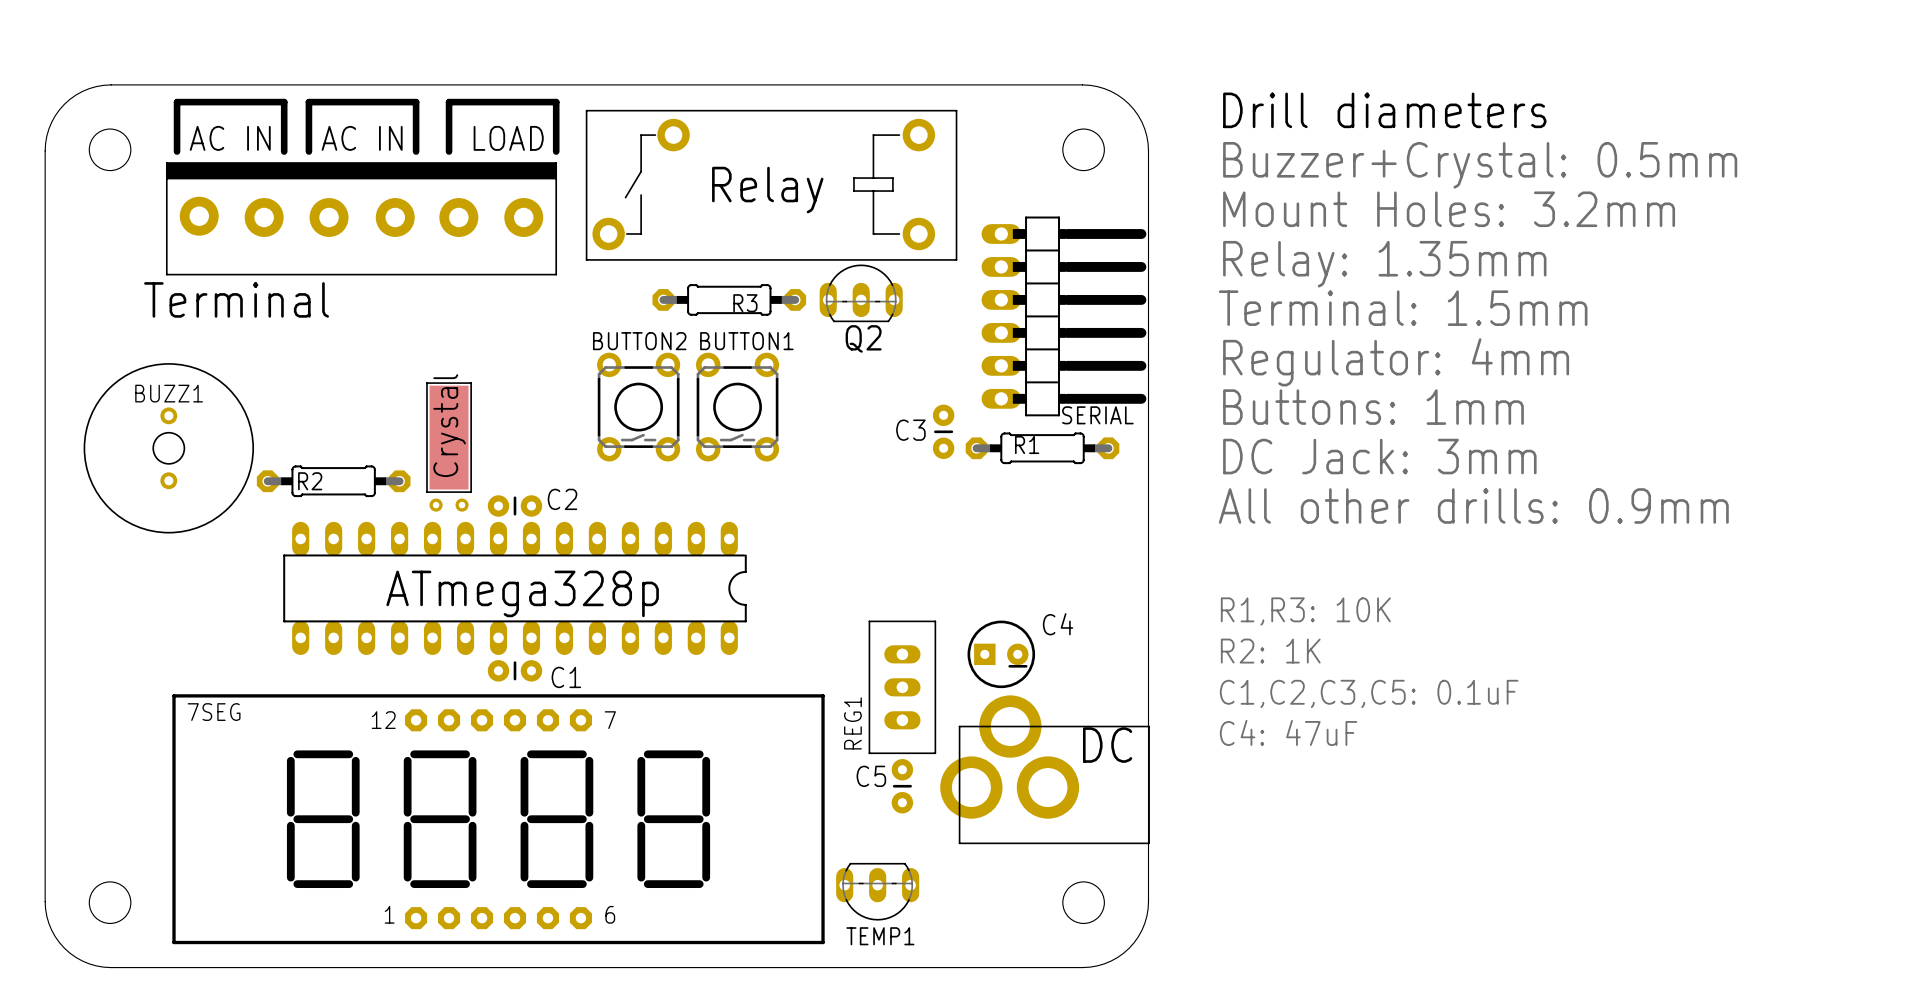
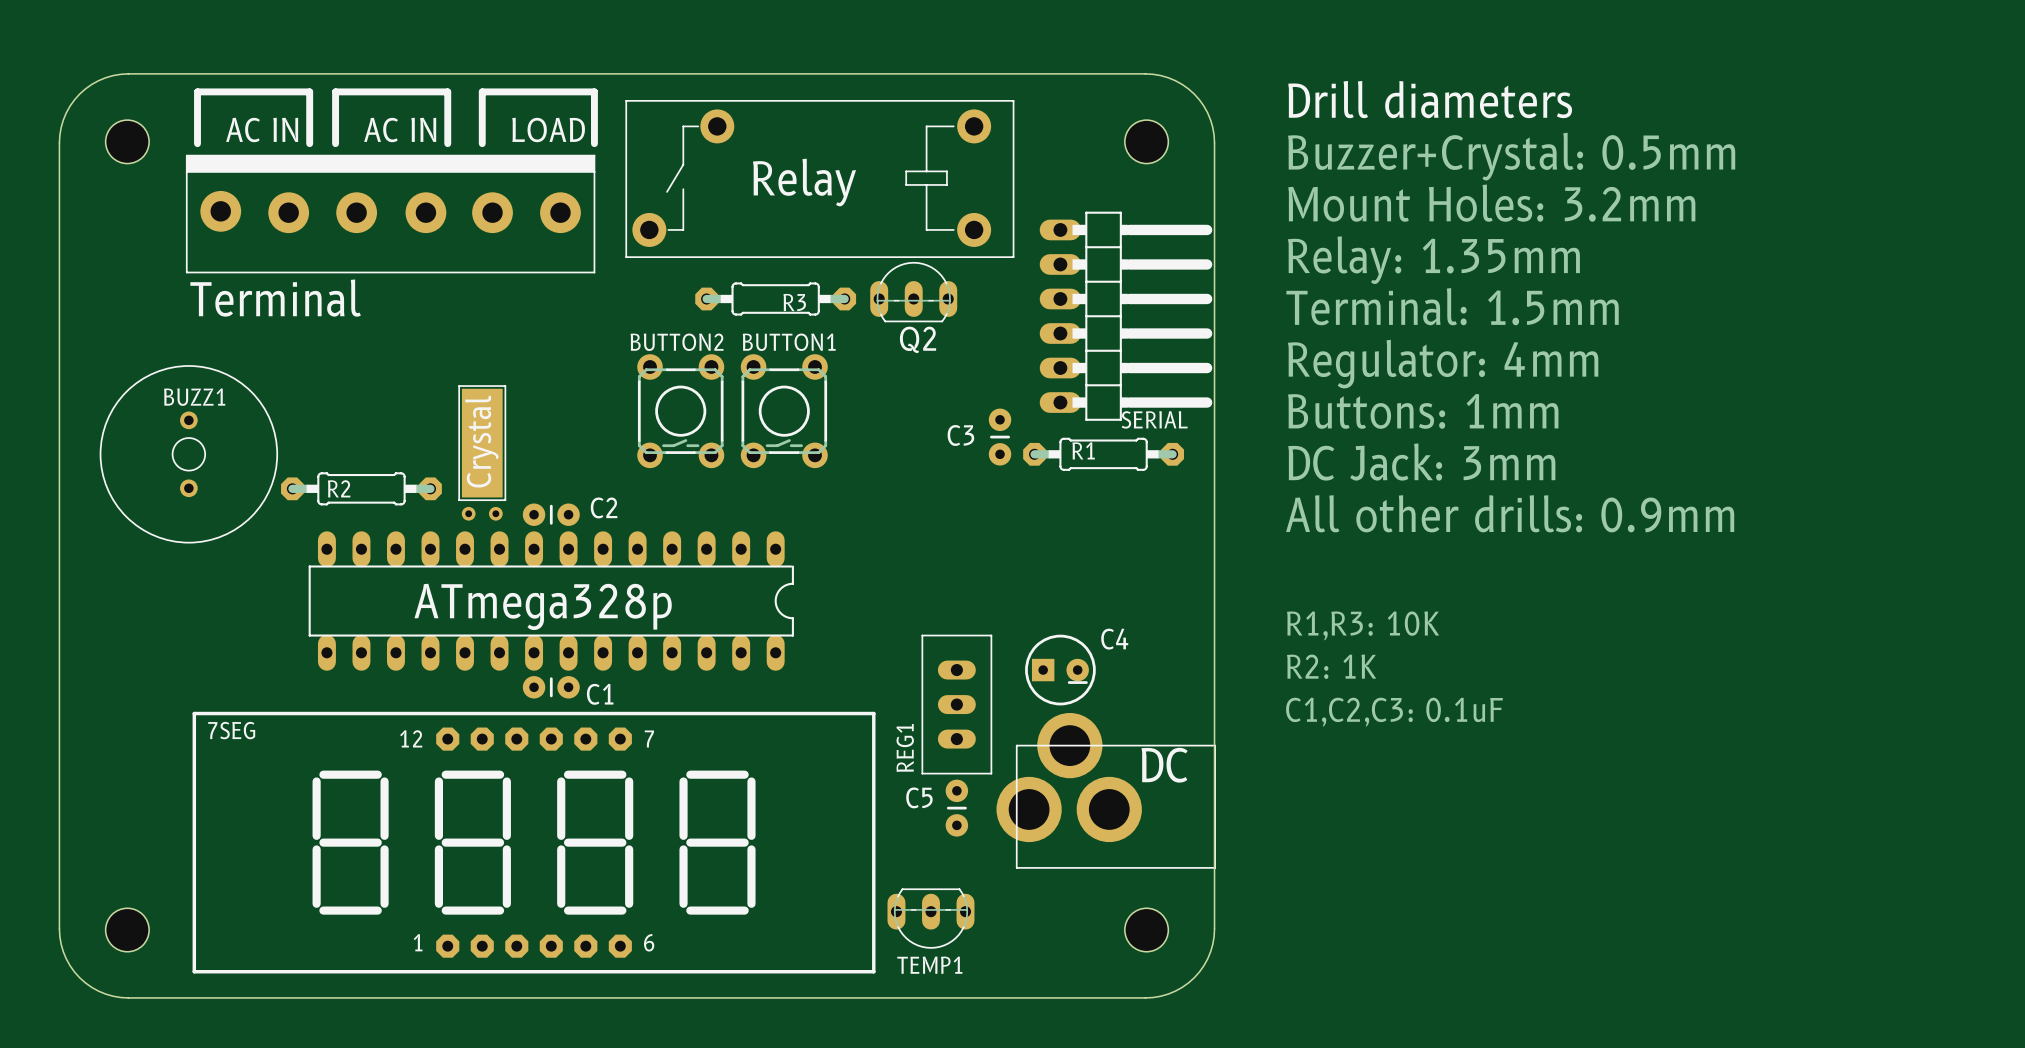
text: C1,C2,C3,C5: 0.1uF (1369, 693) -> C1,C2,C3: 0.1uF (1394, 712)
text: C4: 47uF (1288, 732) -> none

